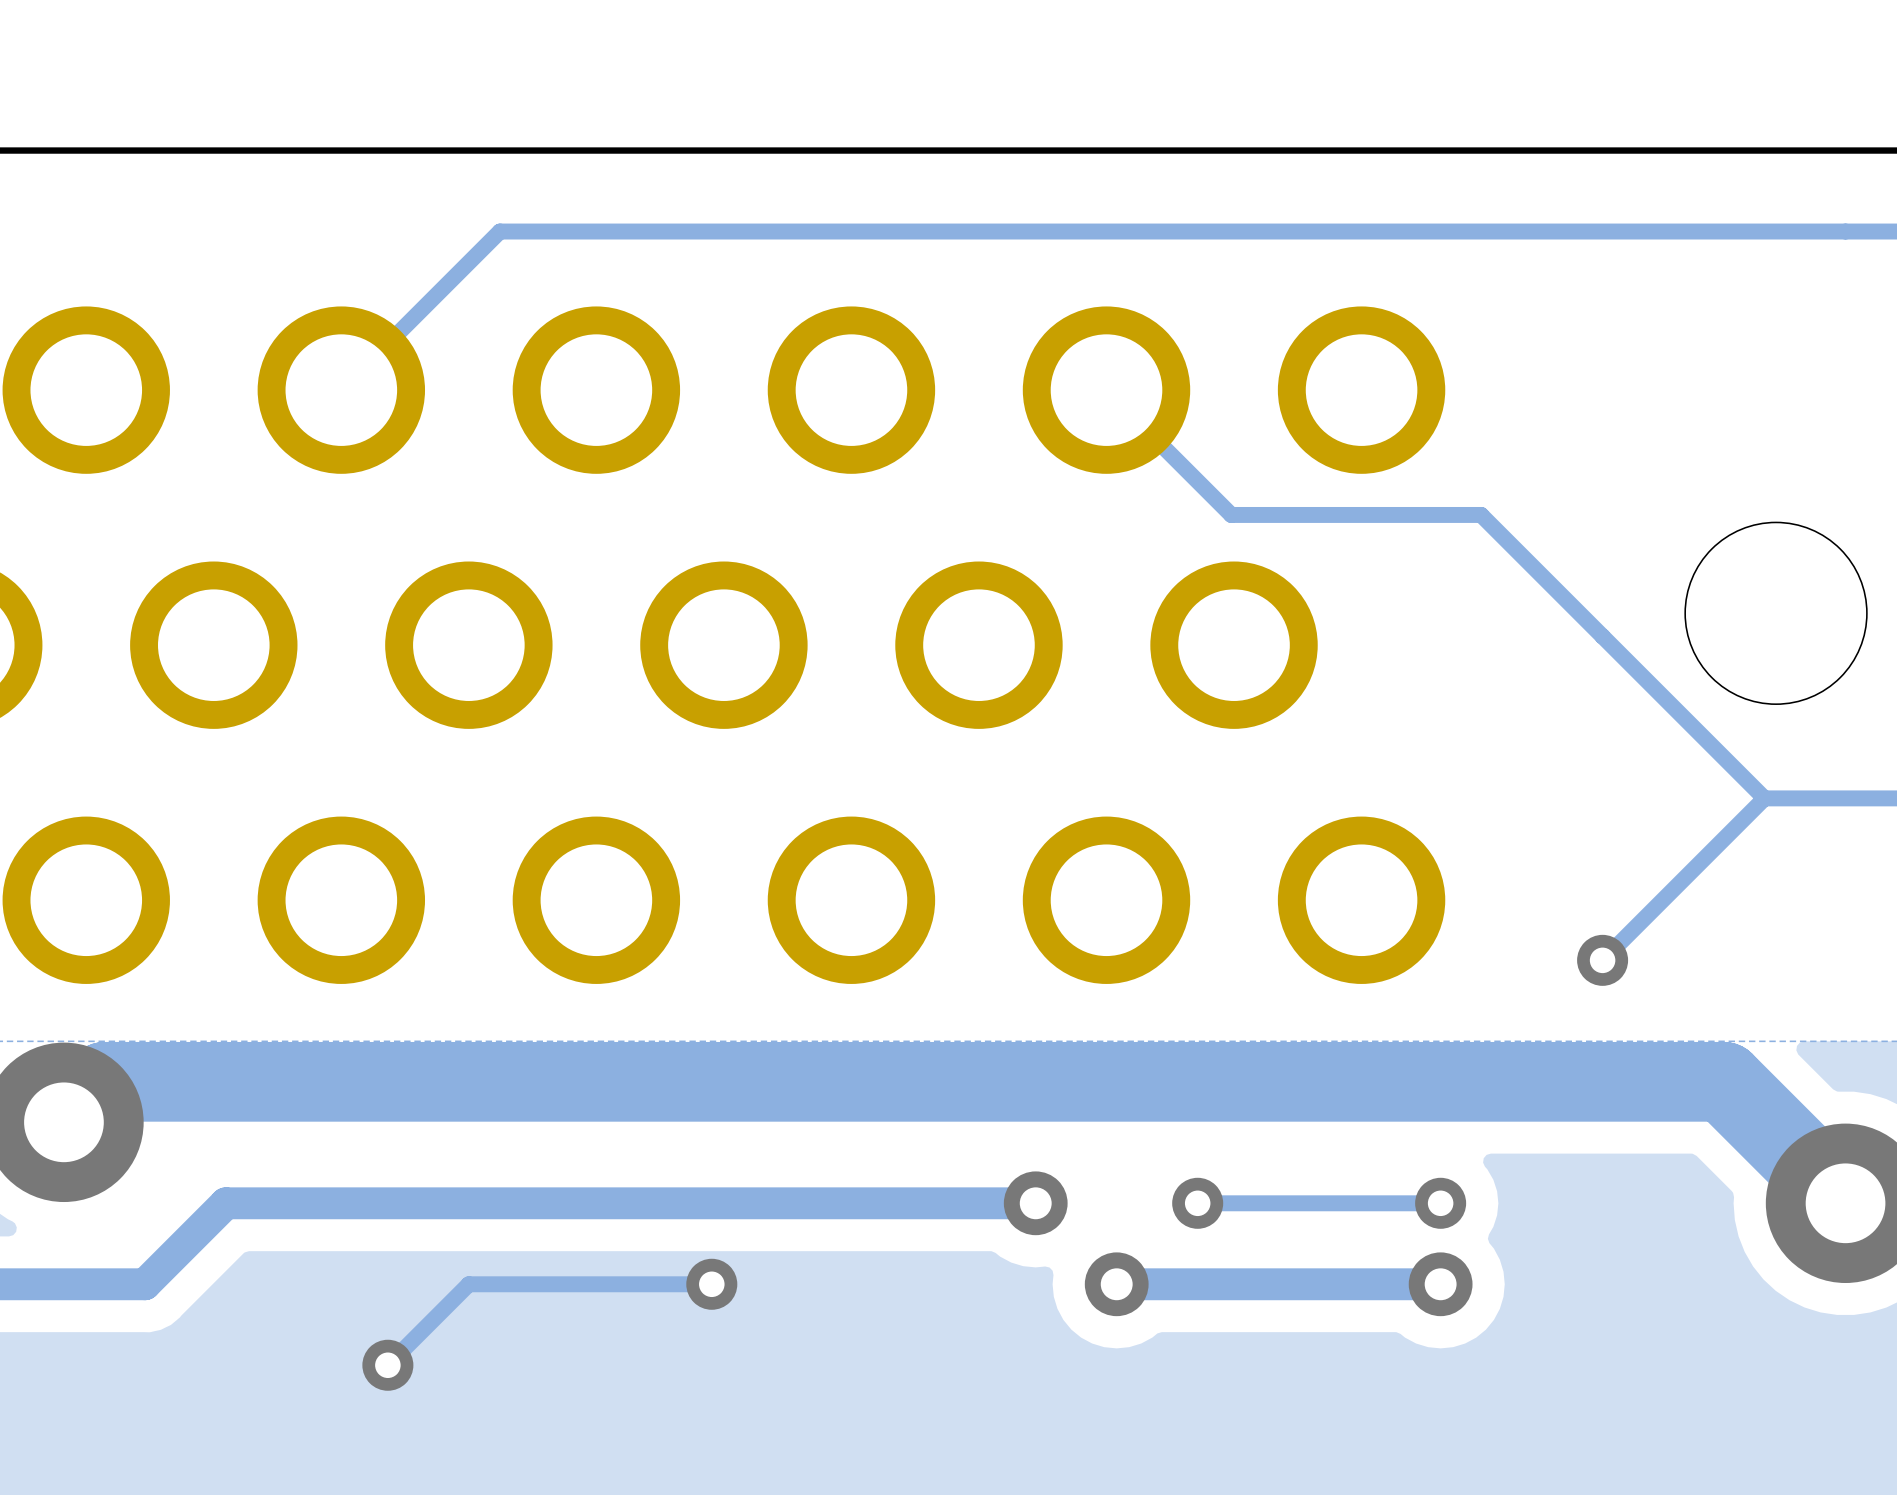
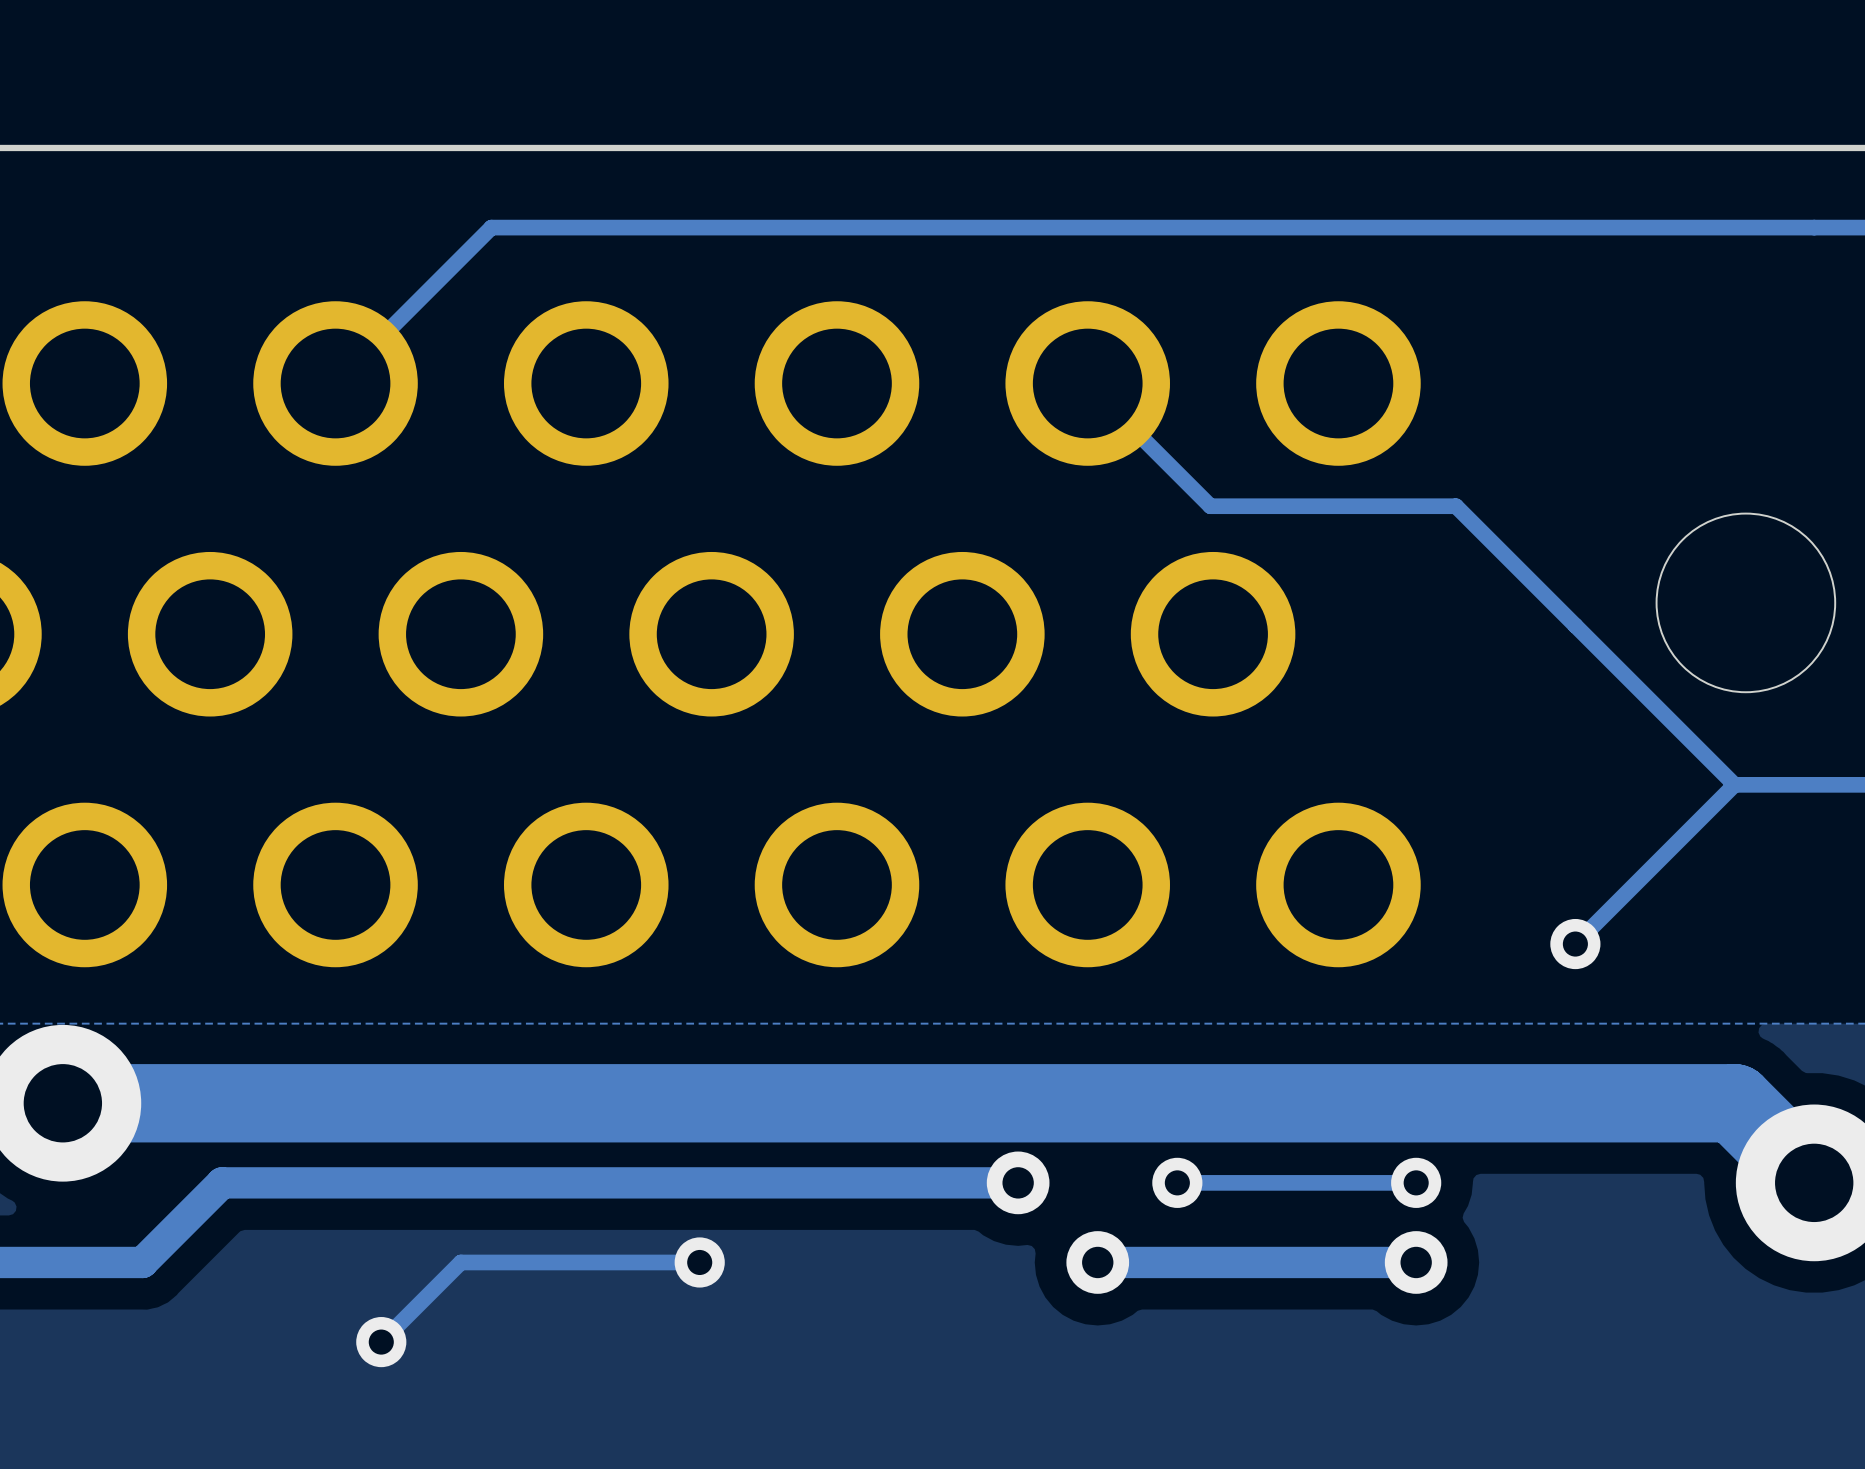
track: (1764, 1122) (1724, 1081) (104, 1081) (63, 1122) -> (1734, 1103) (62, 1103)

